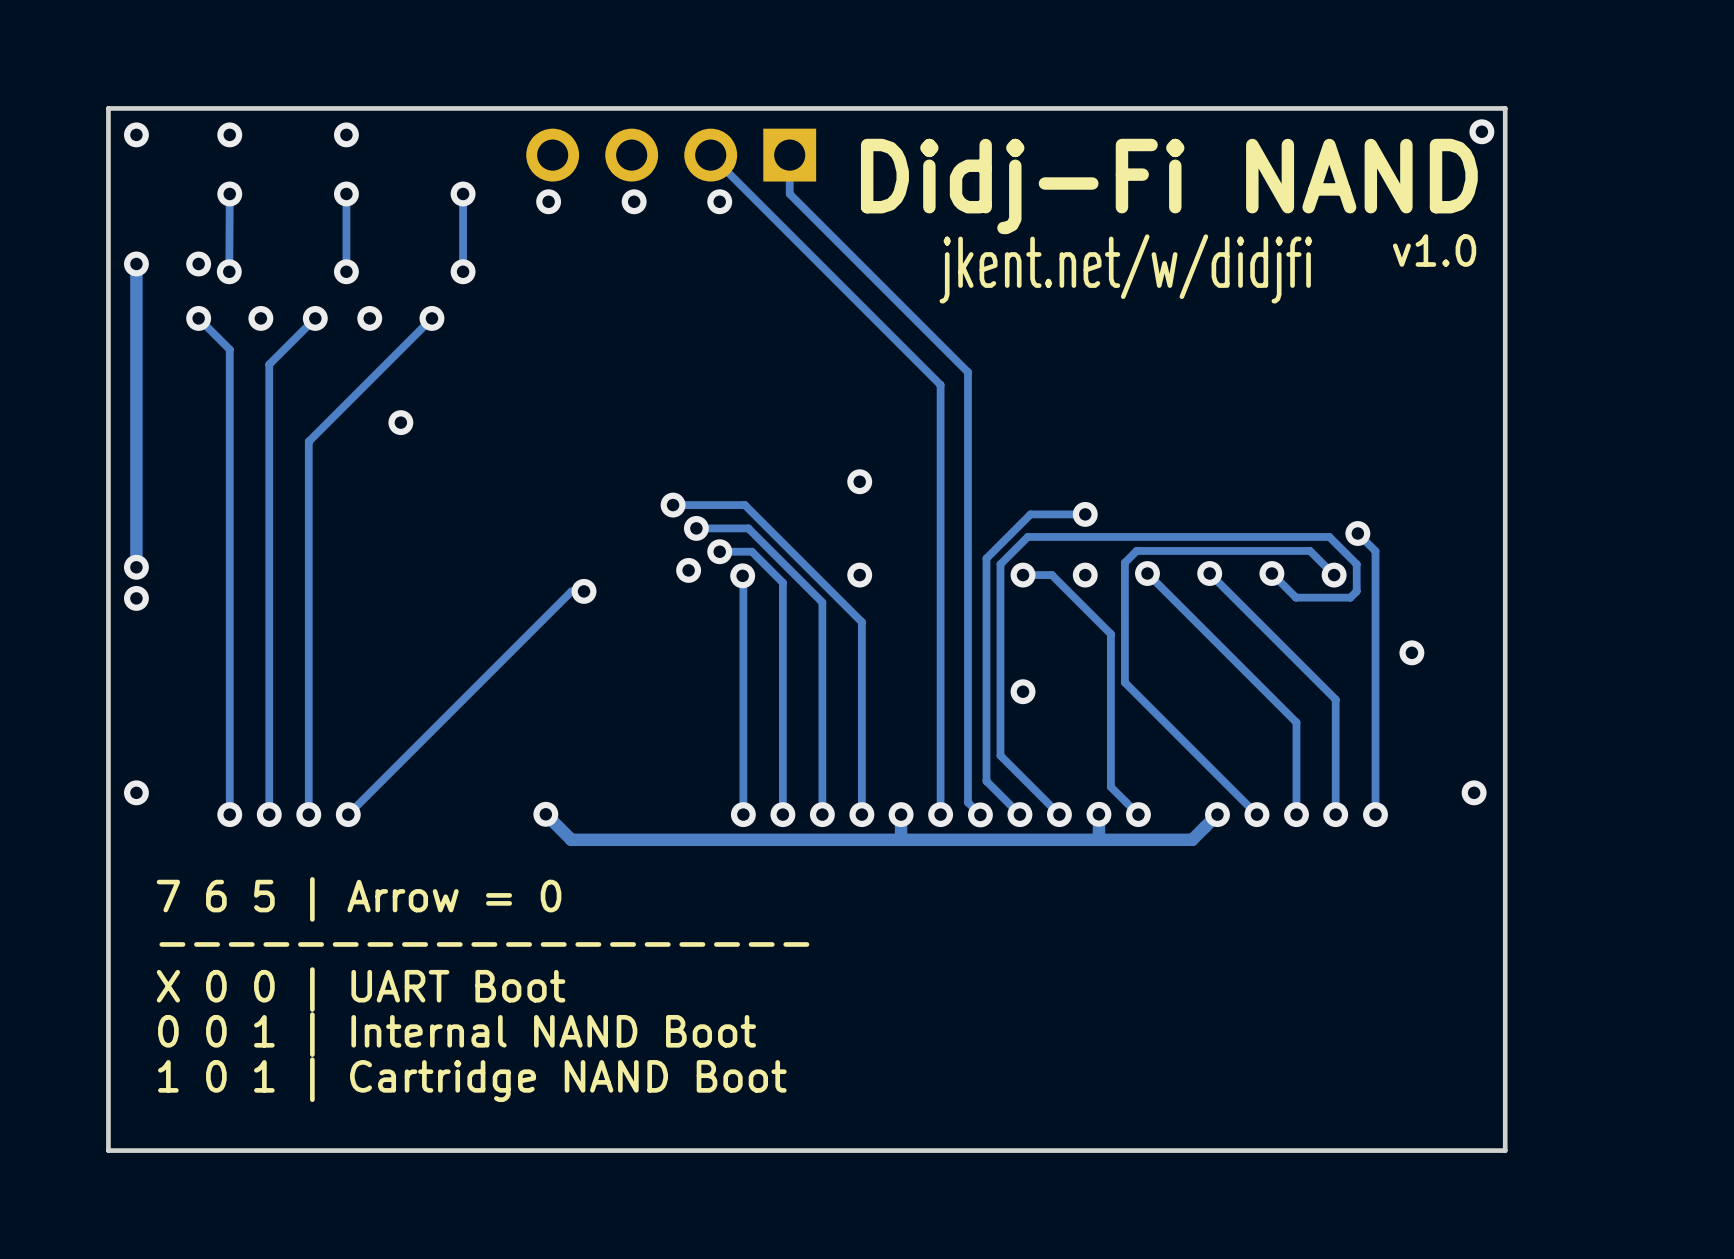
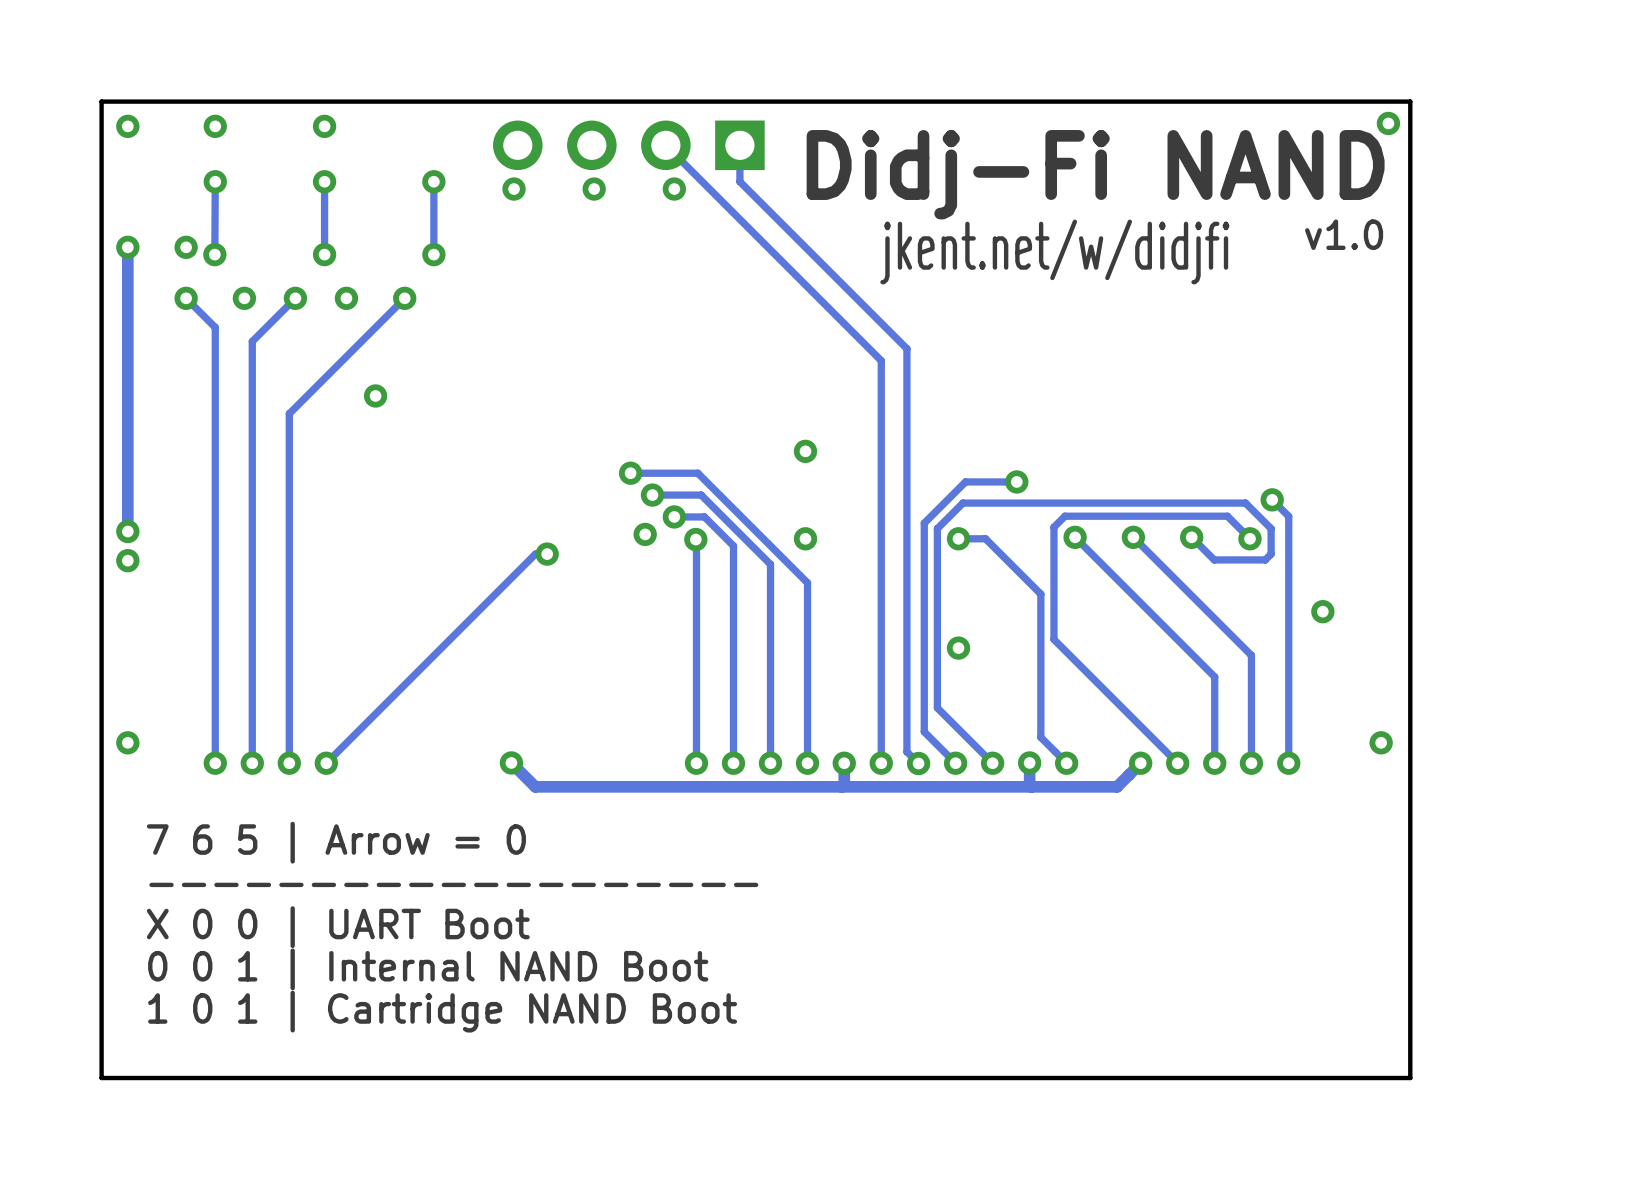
via: (1085, 575) -> none

